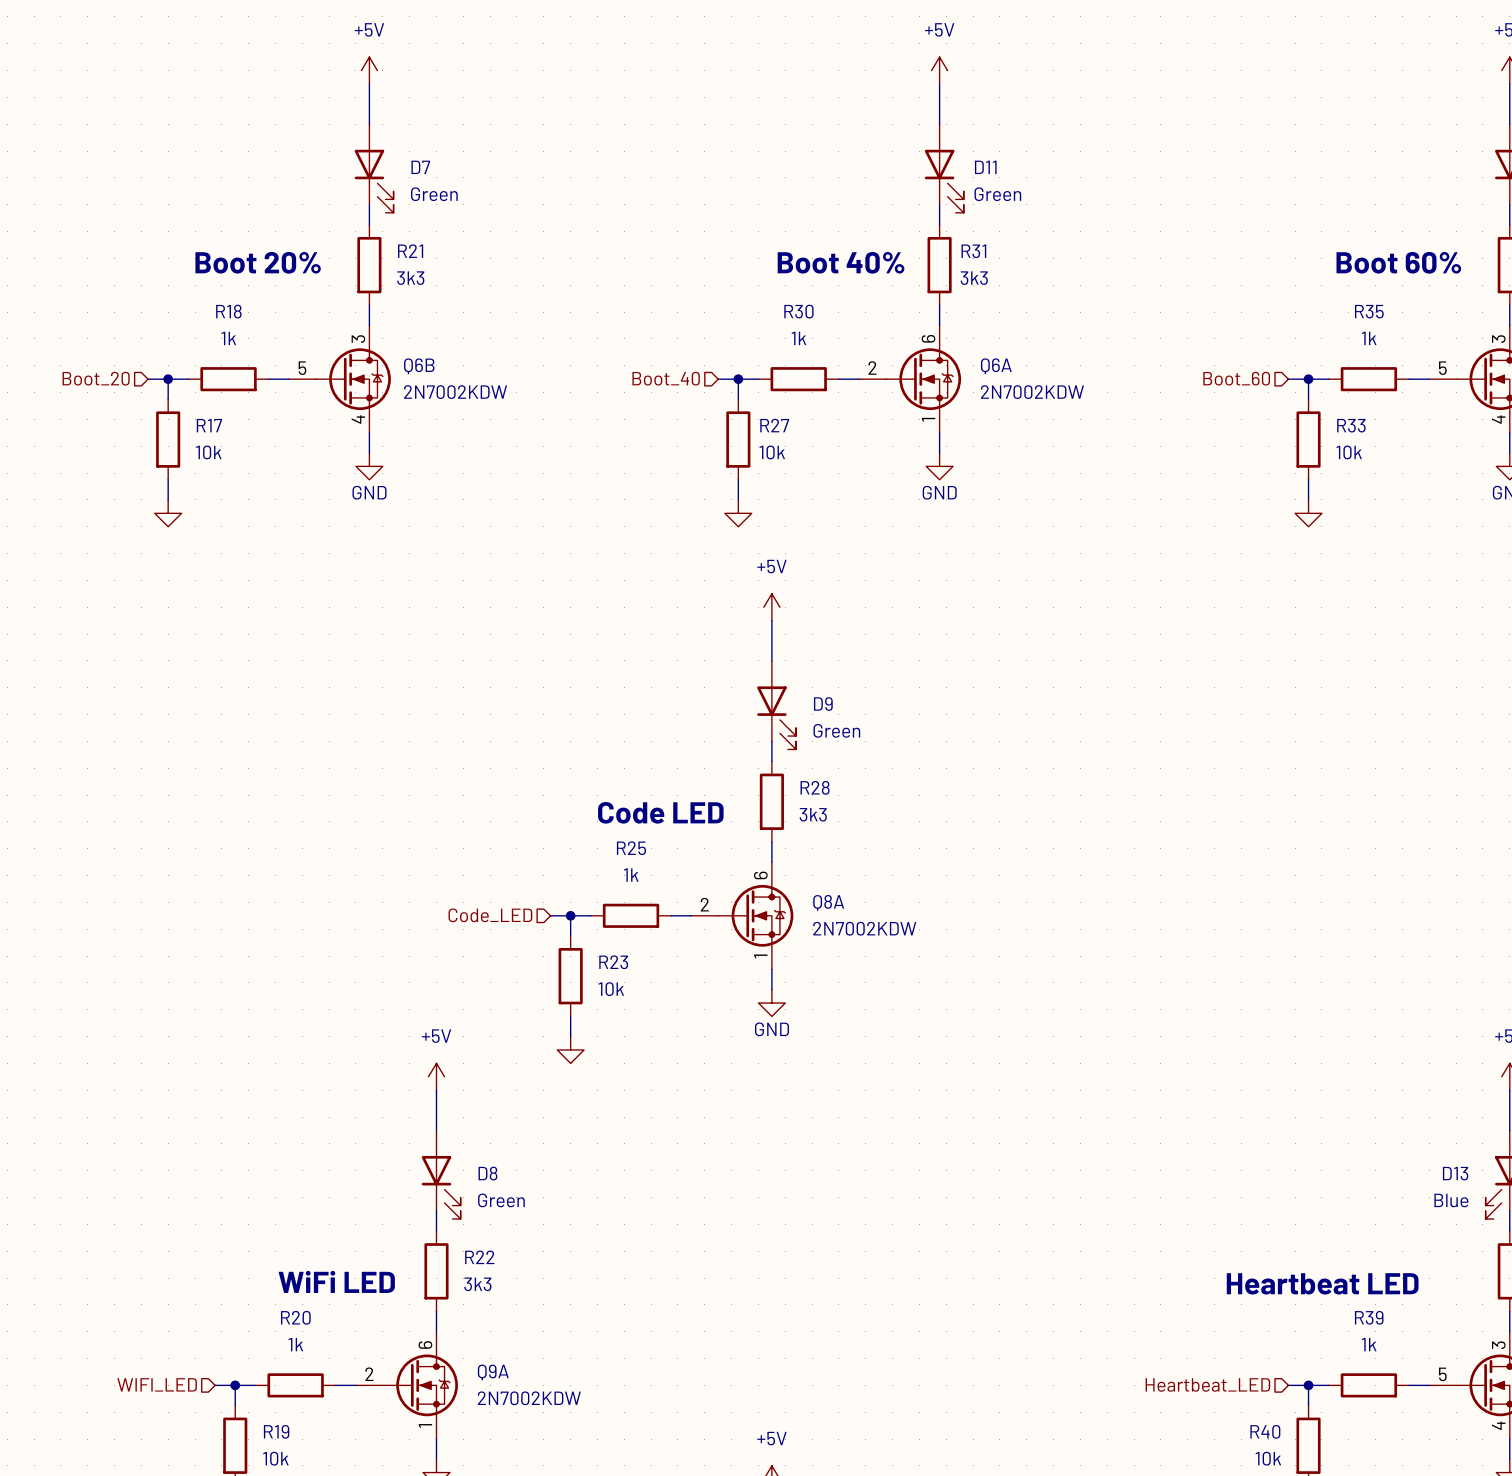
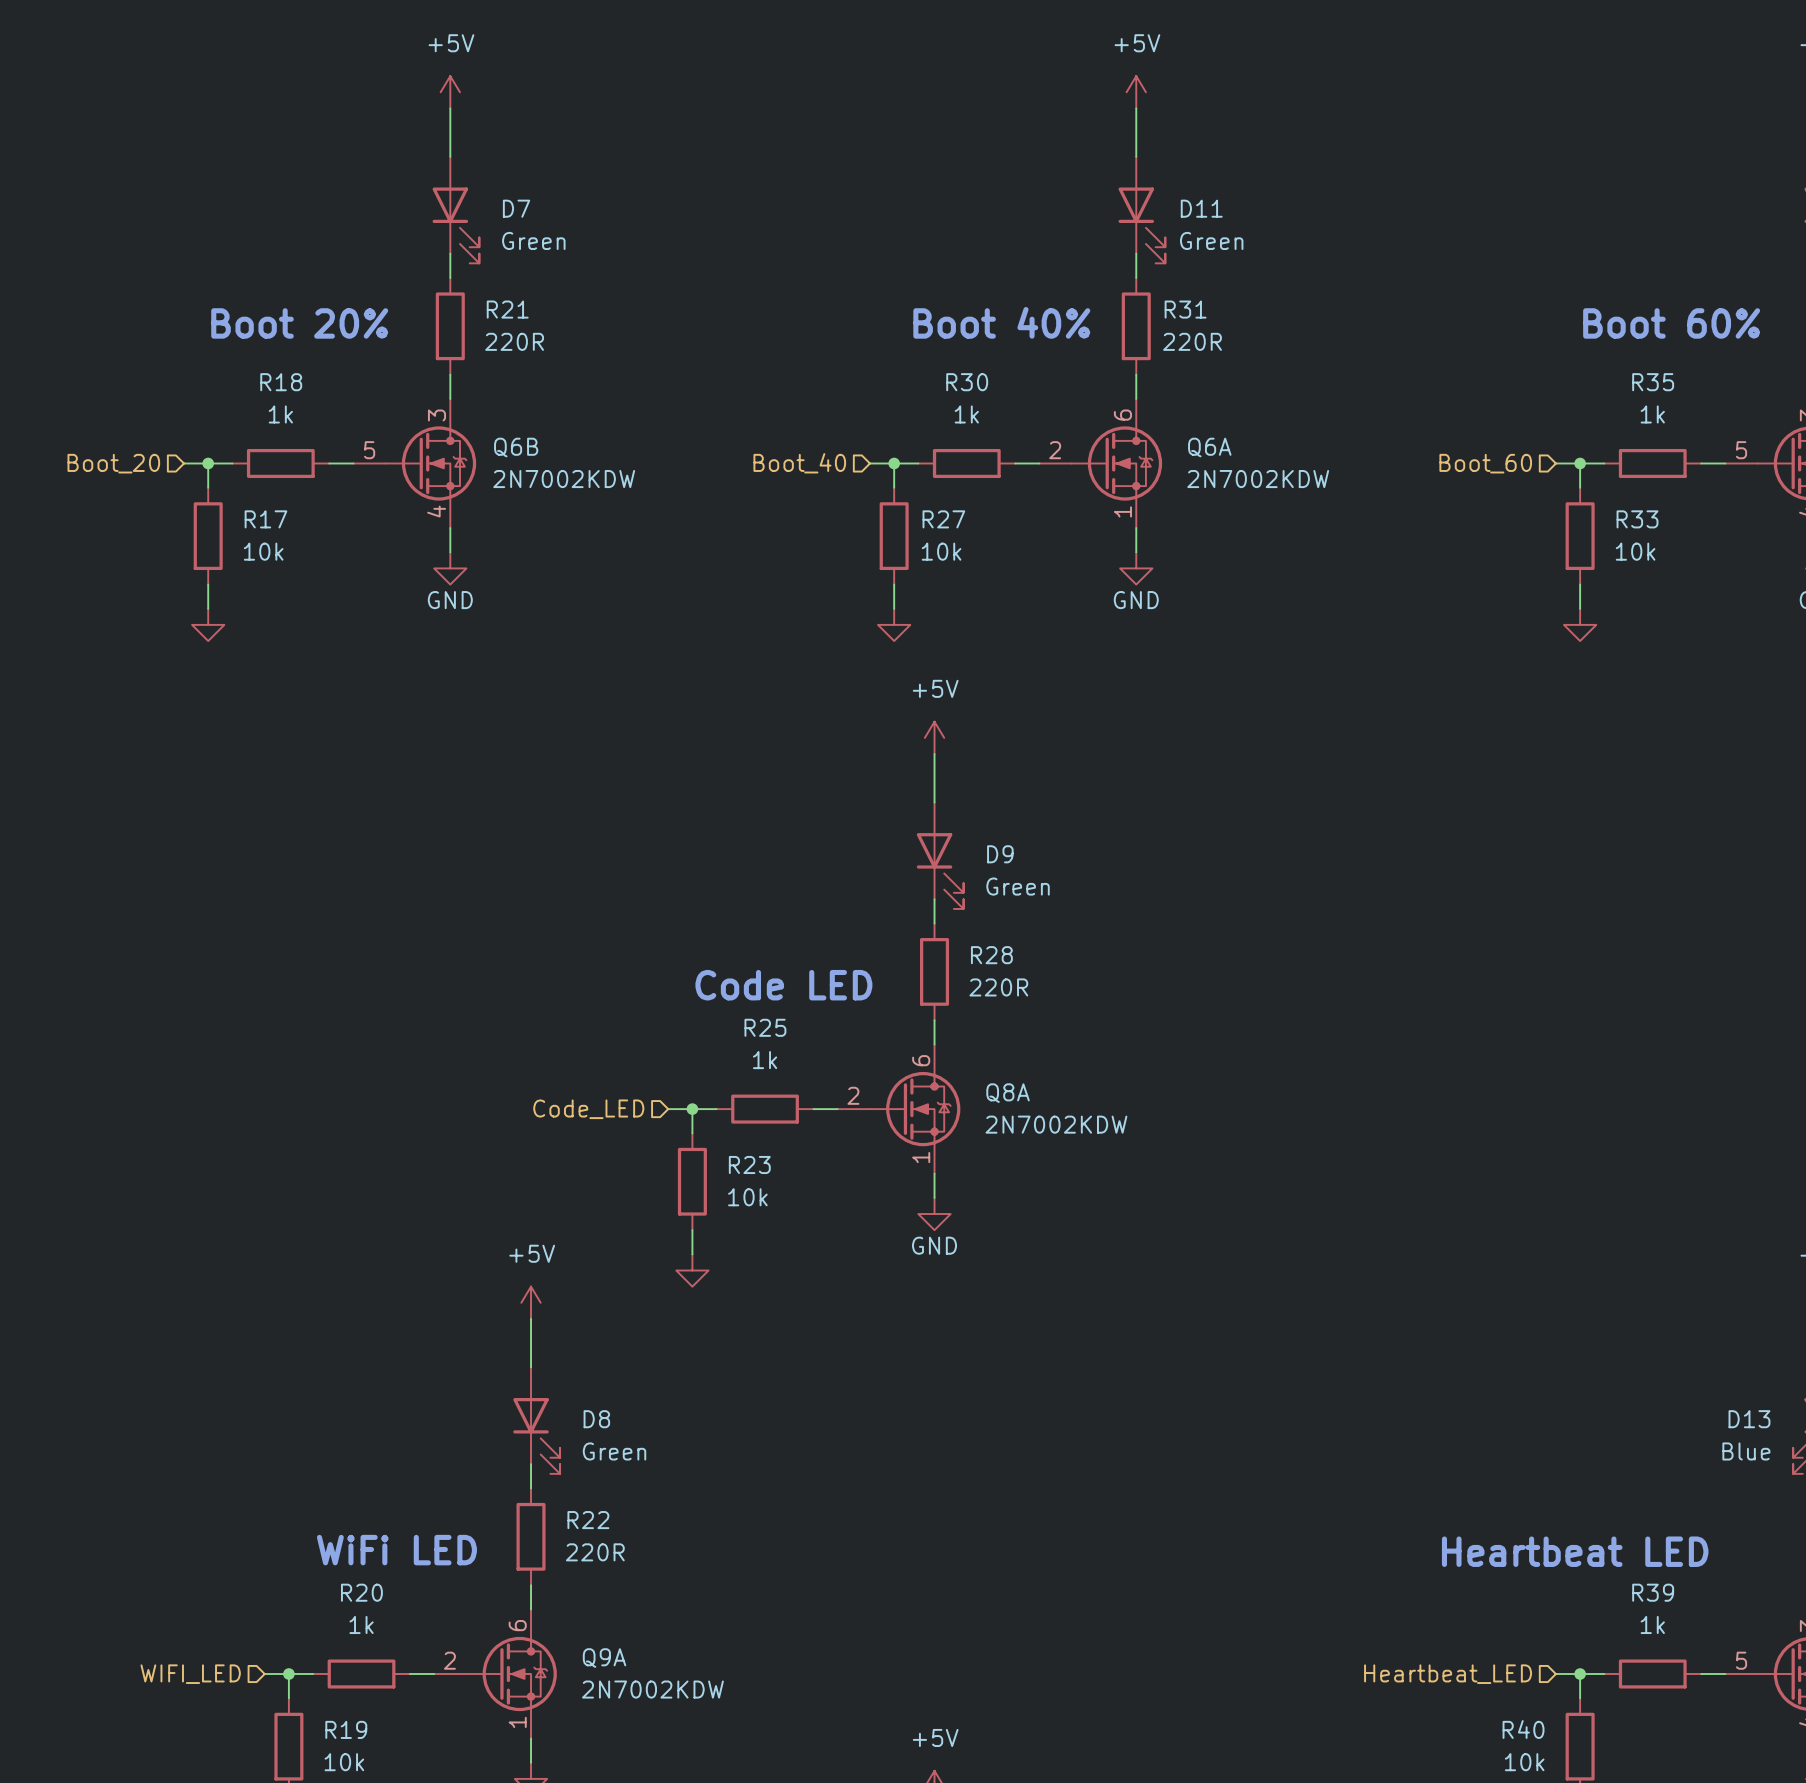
R21 value: 3k3 (410, 278) -> 220R (514, 341)
R31 value: 3k3 (974, 278) -> 220R (1192, 341)
R28 value: 3k3 (813, 814) -> 220R (998, 987)
R22 value: 3k3 (477, 1284) -> 220R (595, 1552)

